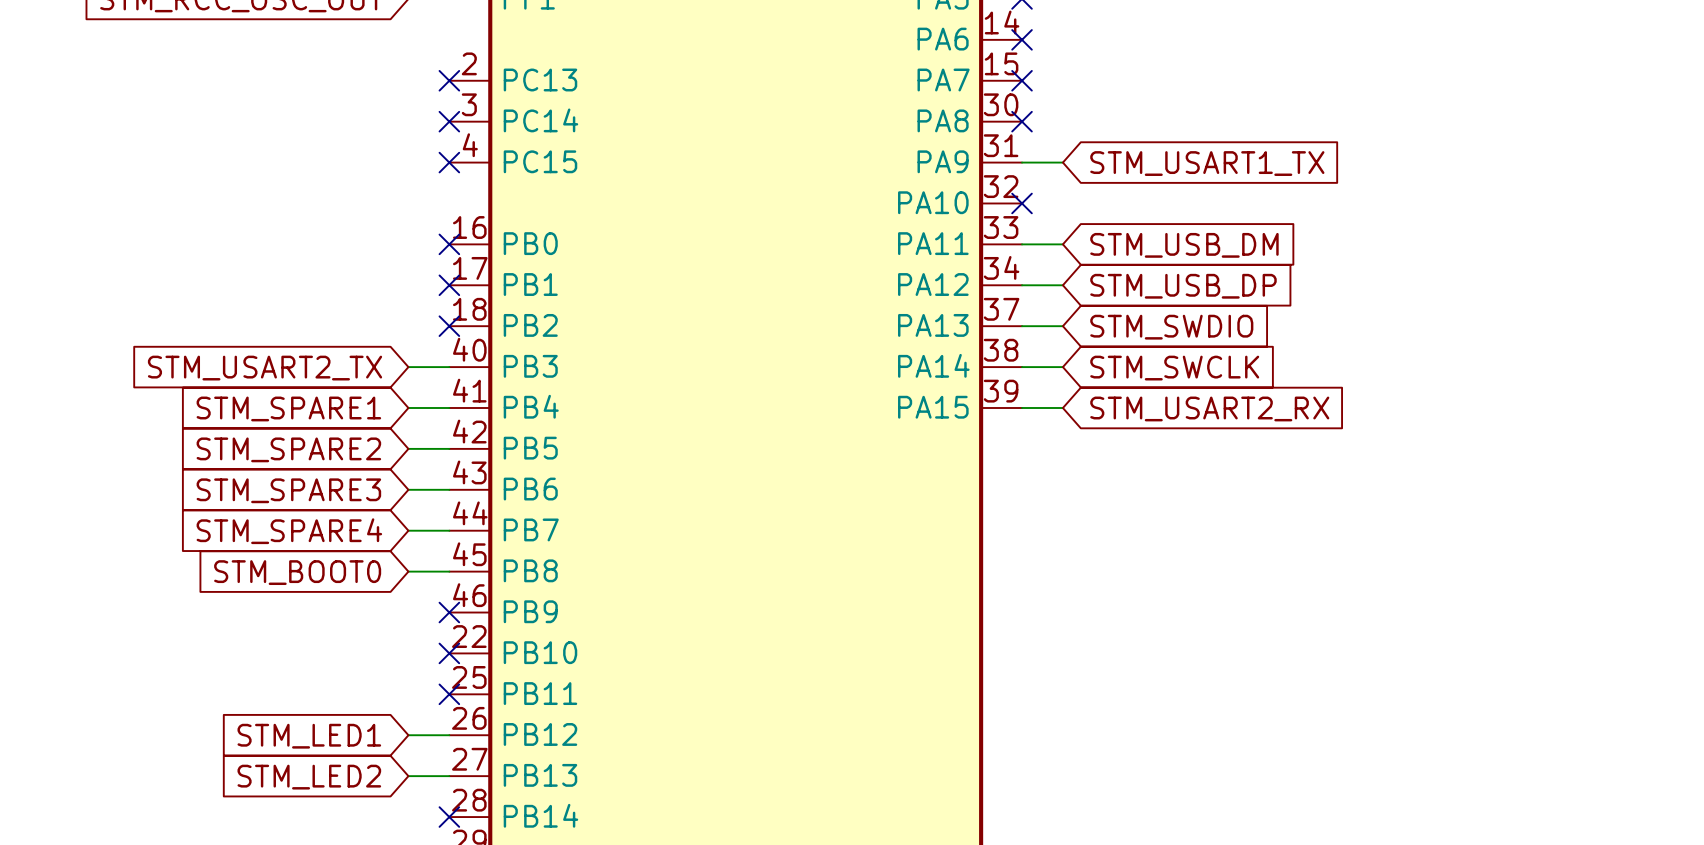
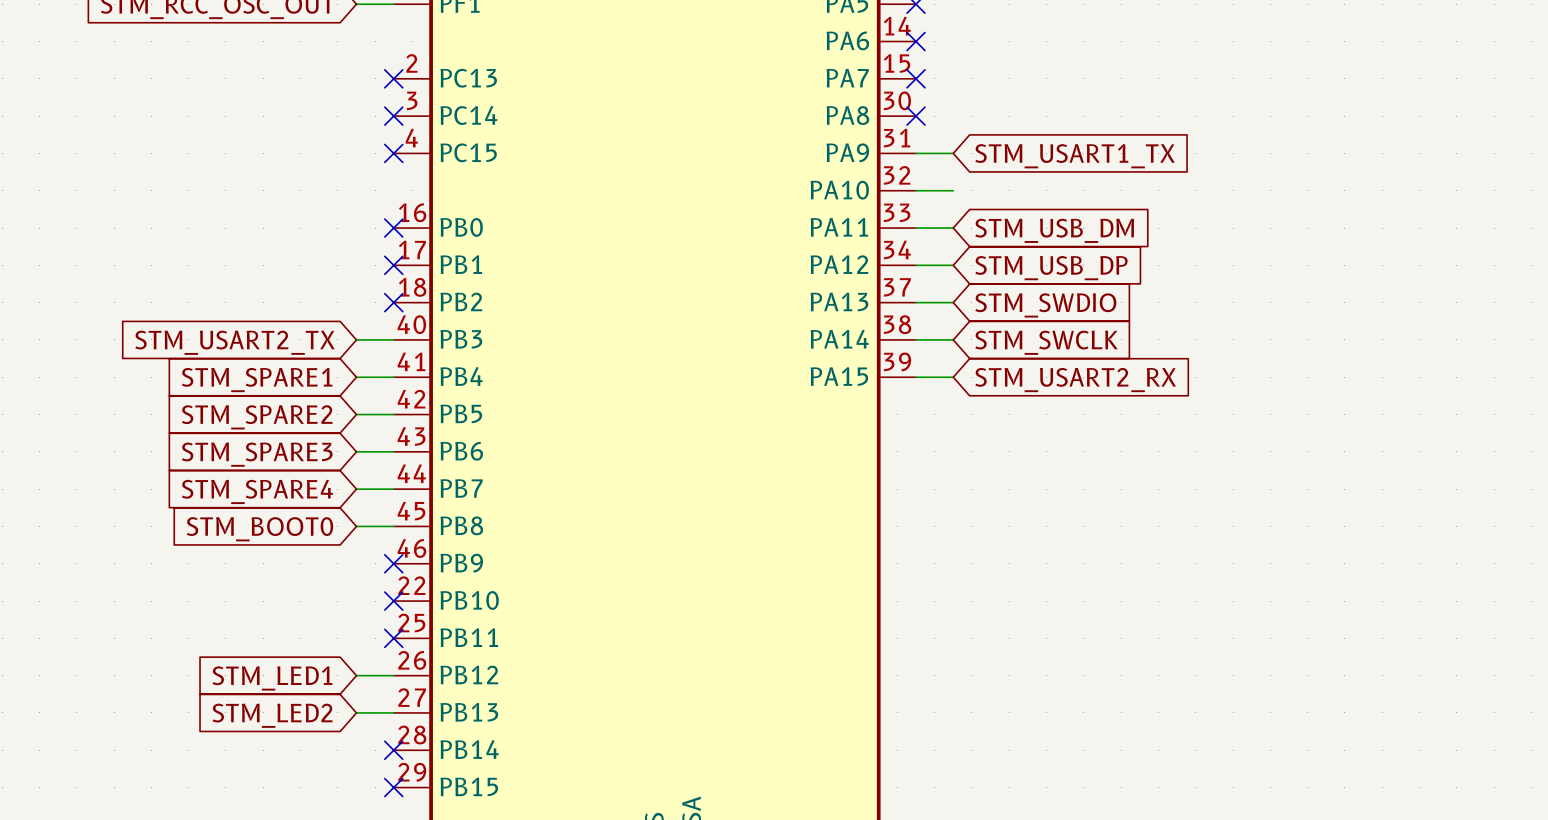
wire: none -> (916, 190) (953, 190)
no-connect mark: (1022, 203) -> none

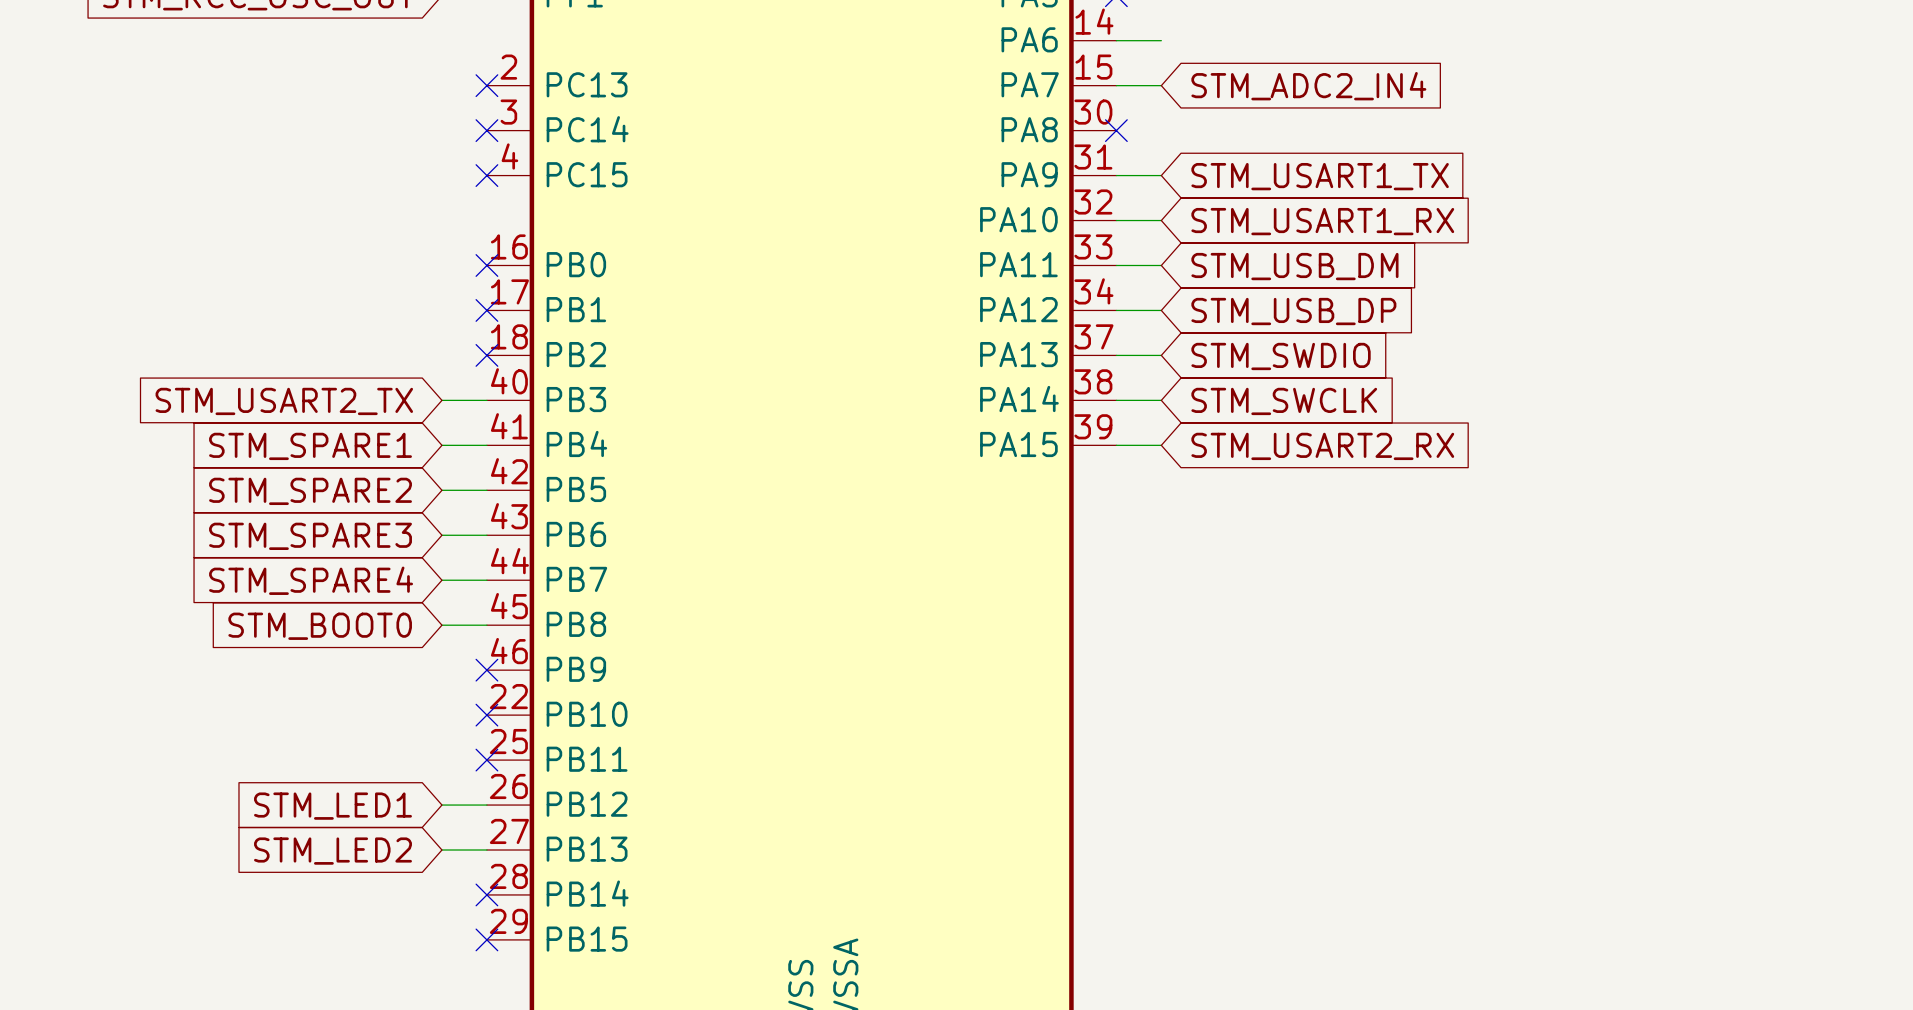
wire: none -> (1116, 40) (1161, 40)
no-connect mark: (916, 41) -> none
wire: none -> (1116, 85) (1161, 85)
no-connect mark: (916, 78) -> none
global label: none -> STM_ADC2_IN4 (1308, 86)
global label: none -> STM_USART1_RX (1322, 221)

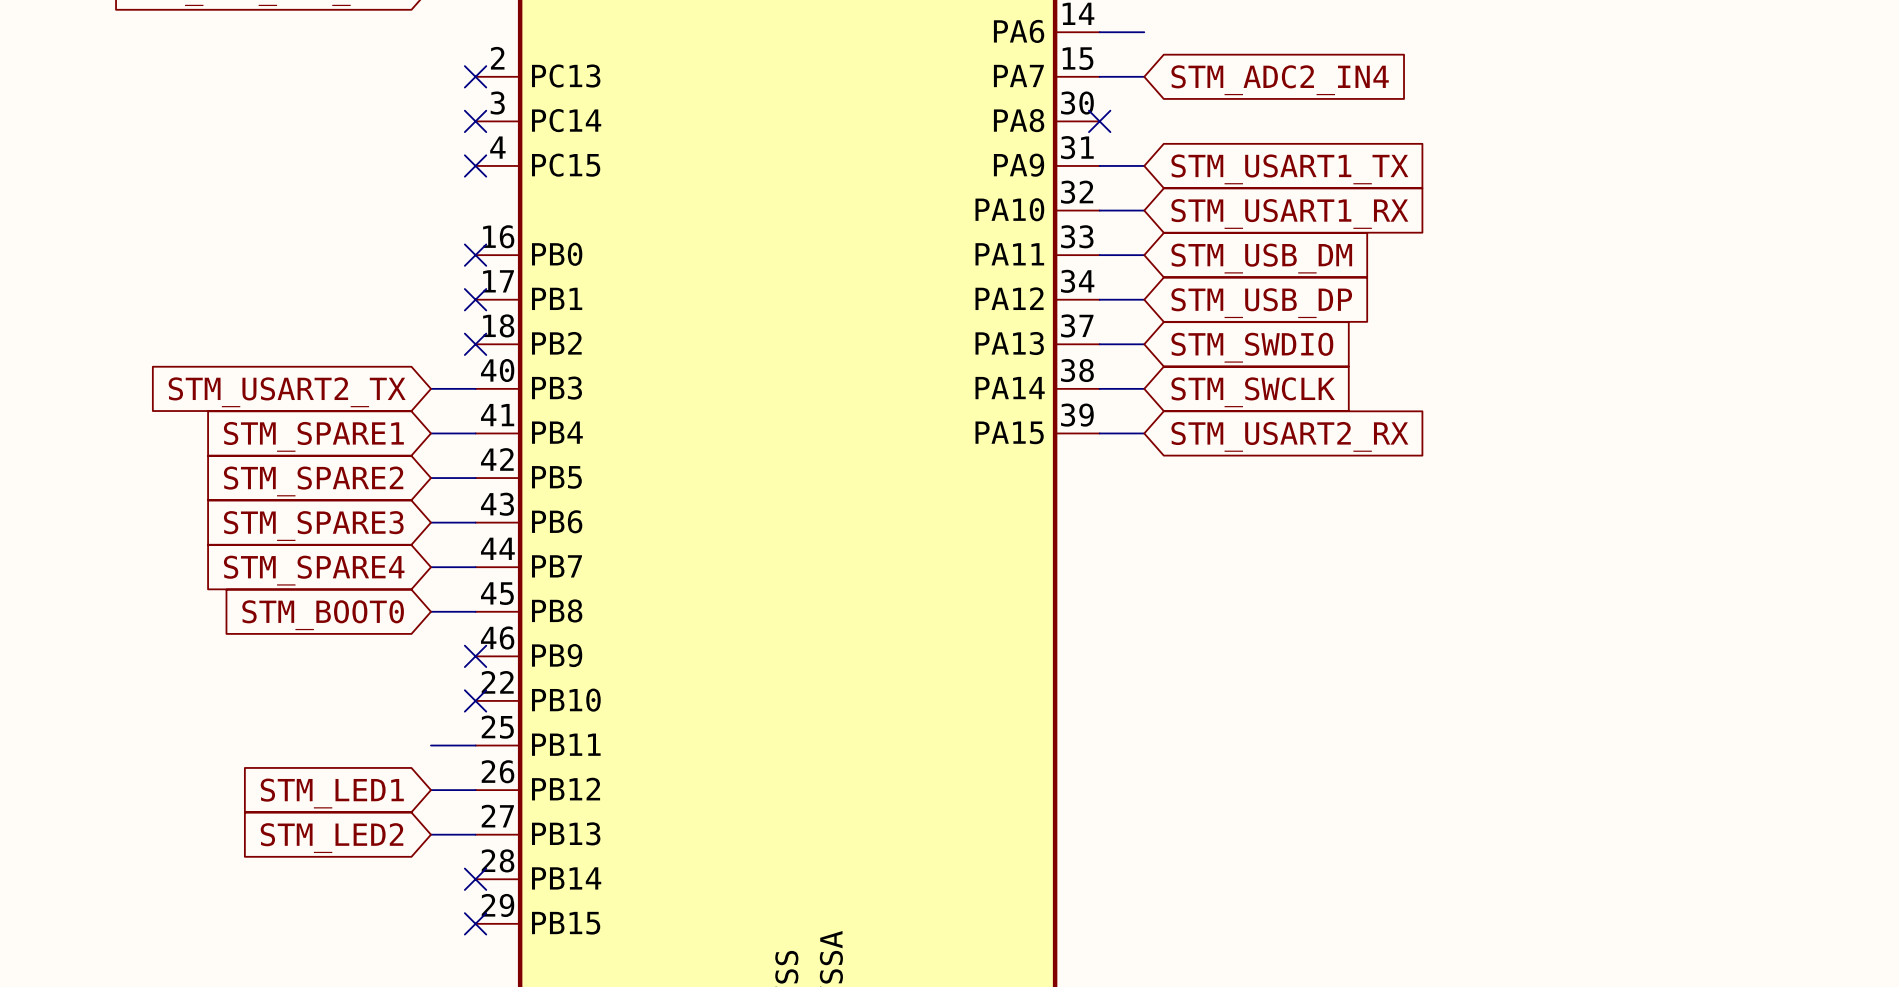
wire: none -> (430, 745) (475, 745)
no-connect mark: (486, 760) -> none

